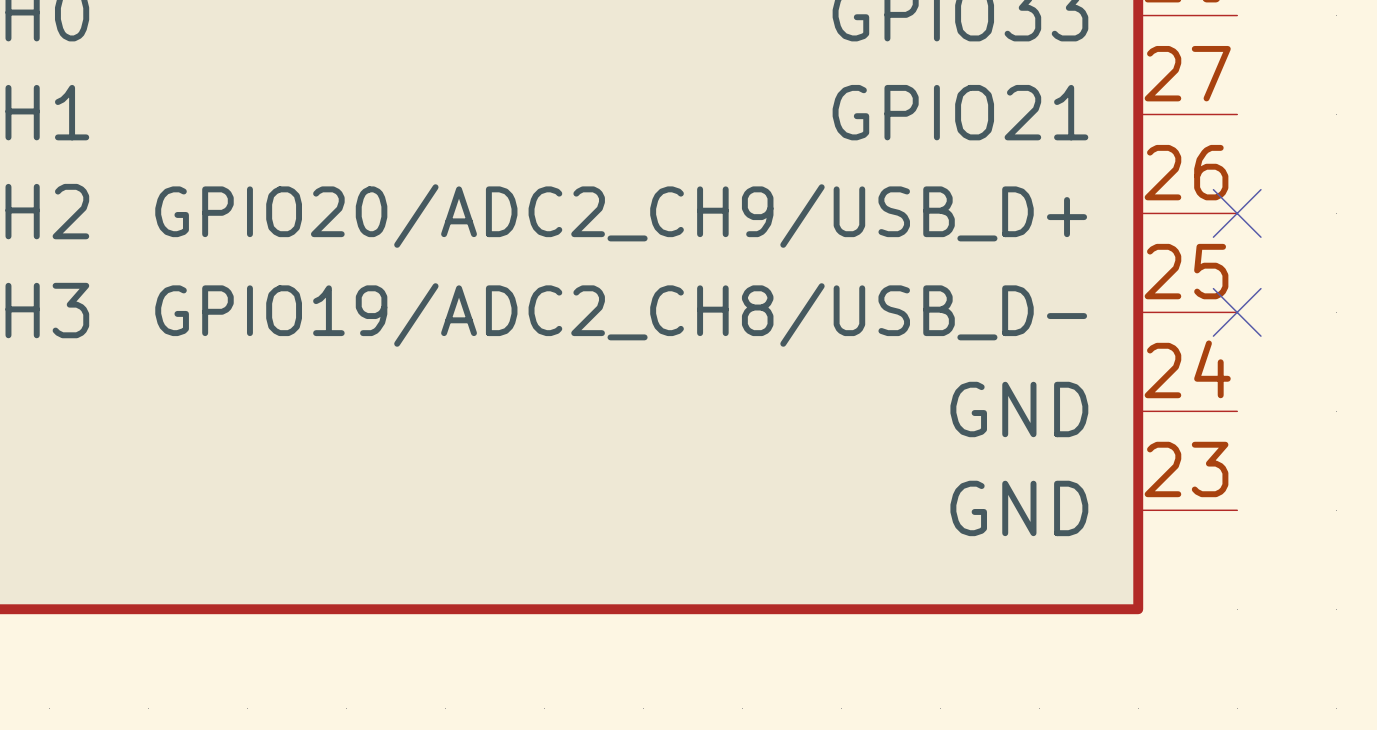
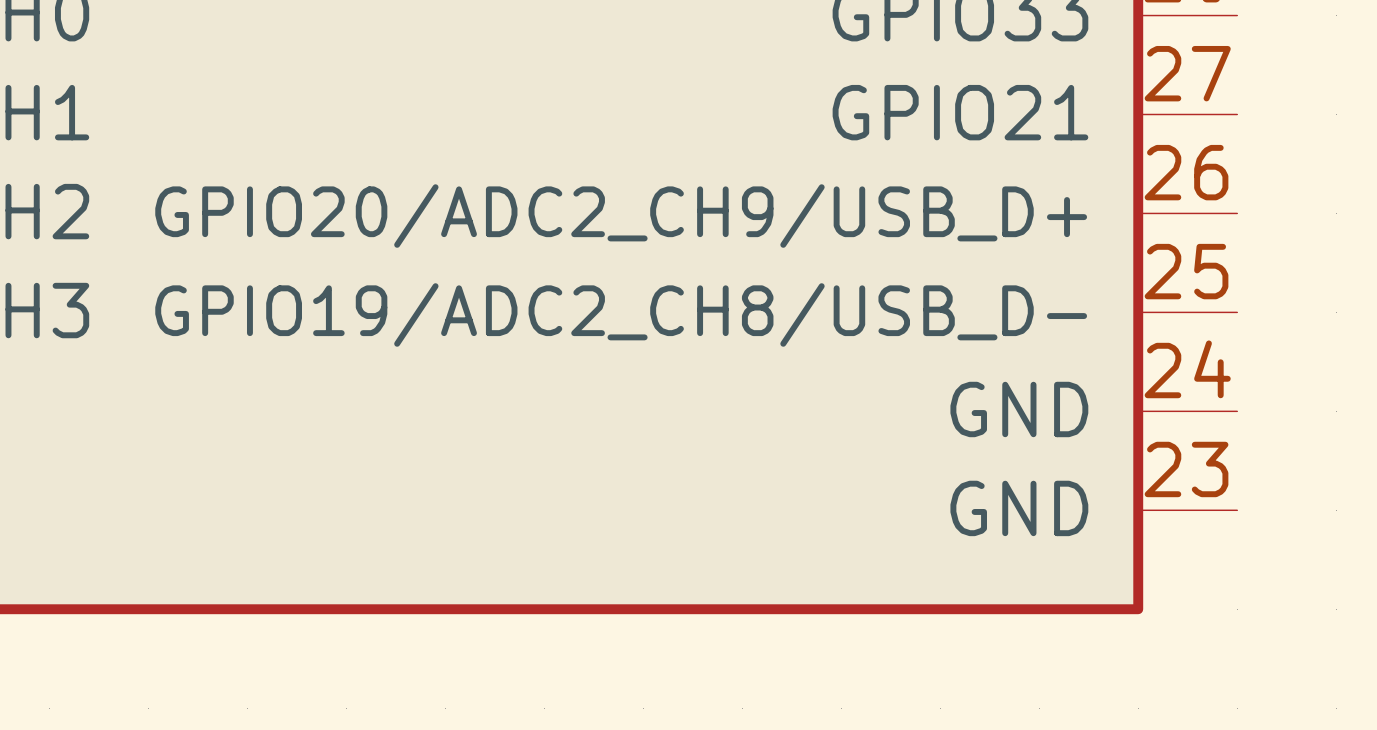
no-connect mark: (1237, 213) -> none
no-connect mark: (1237, 312) -> none

